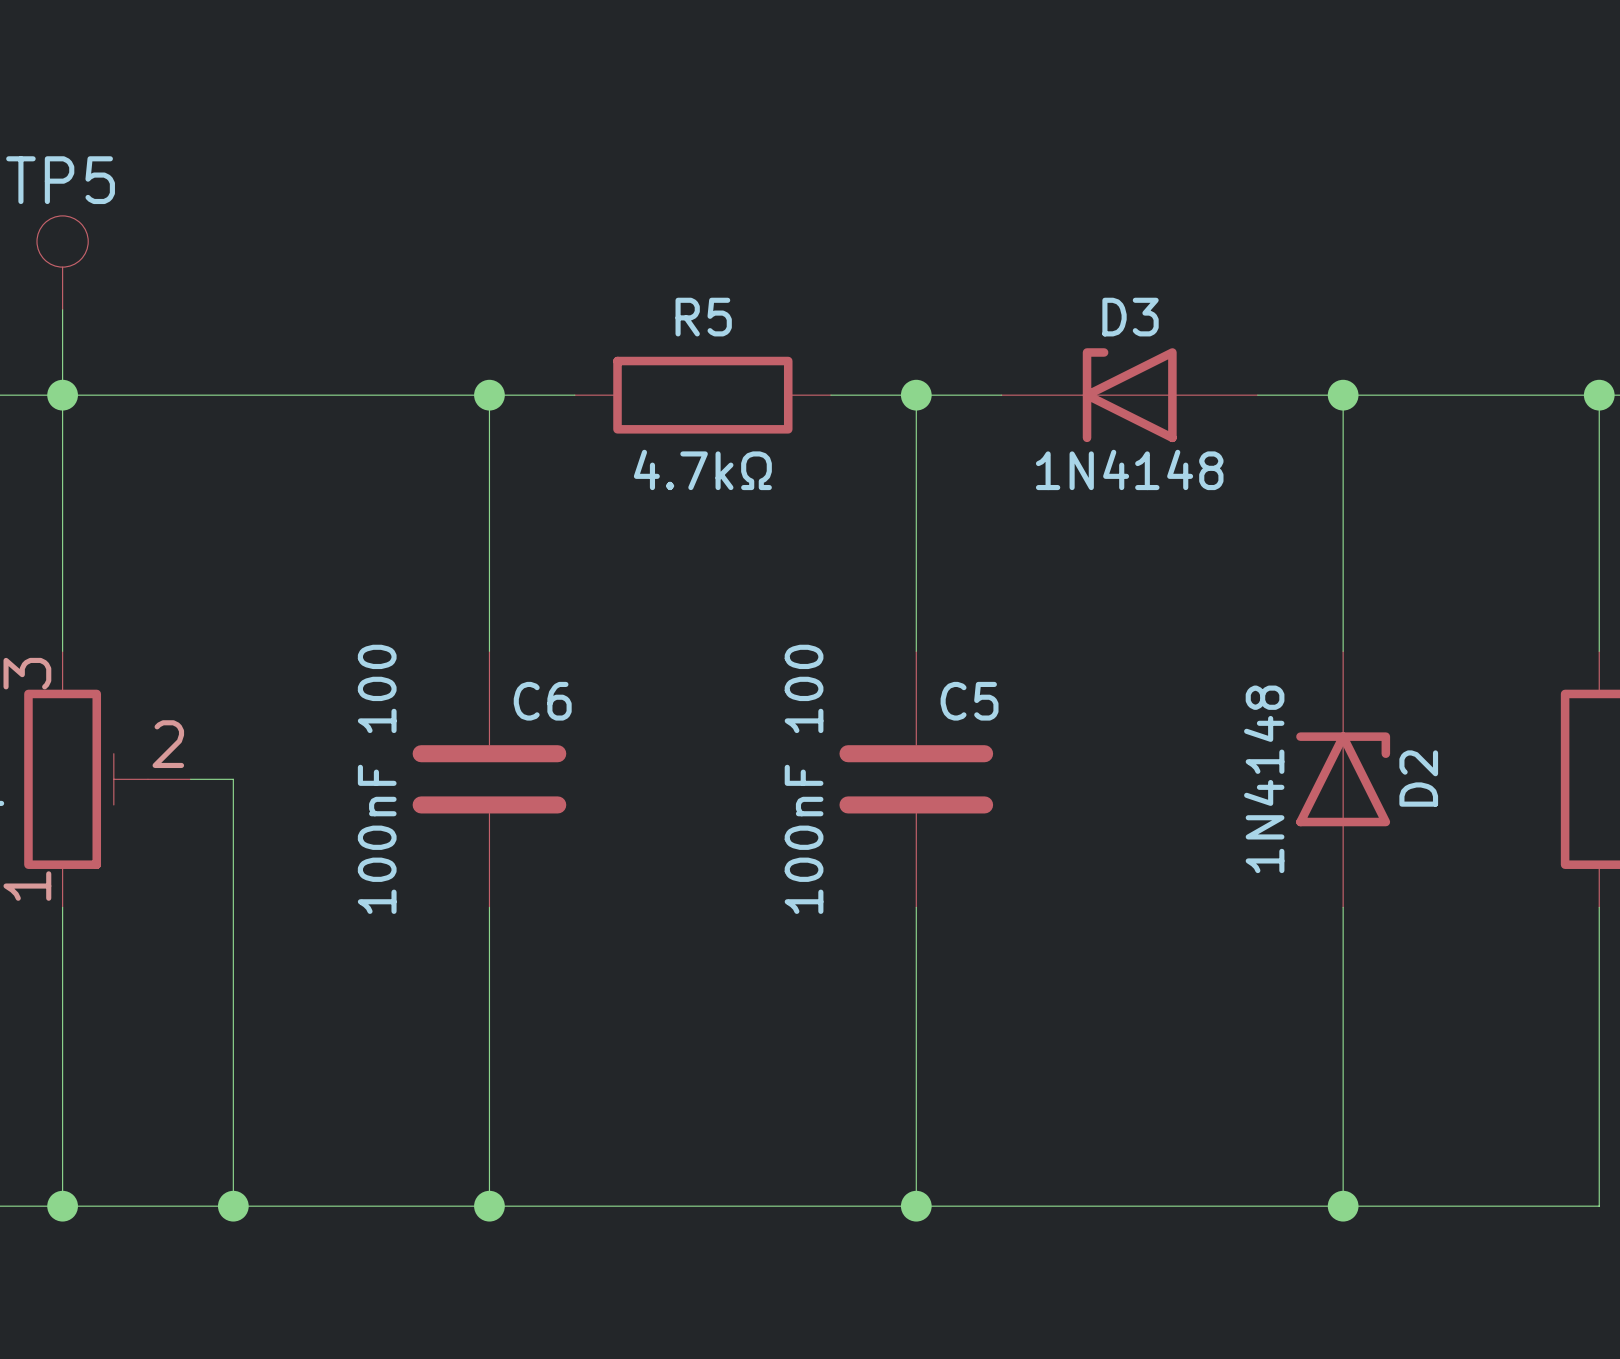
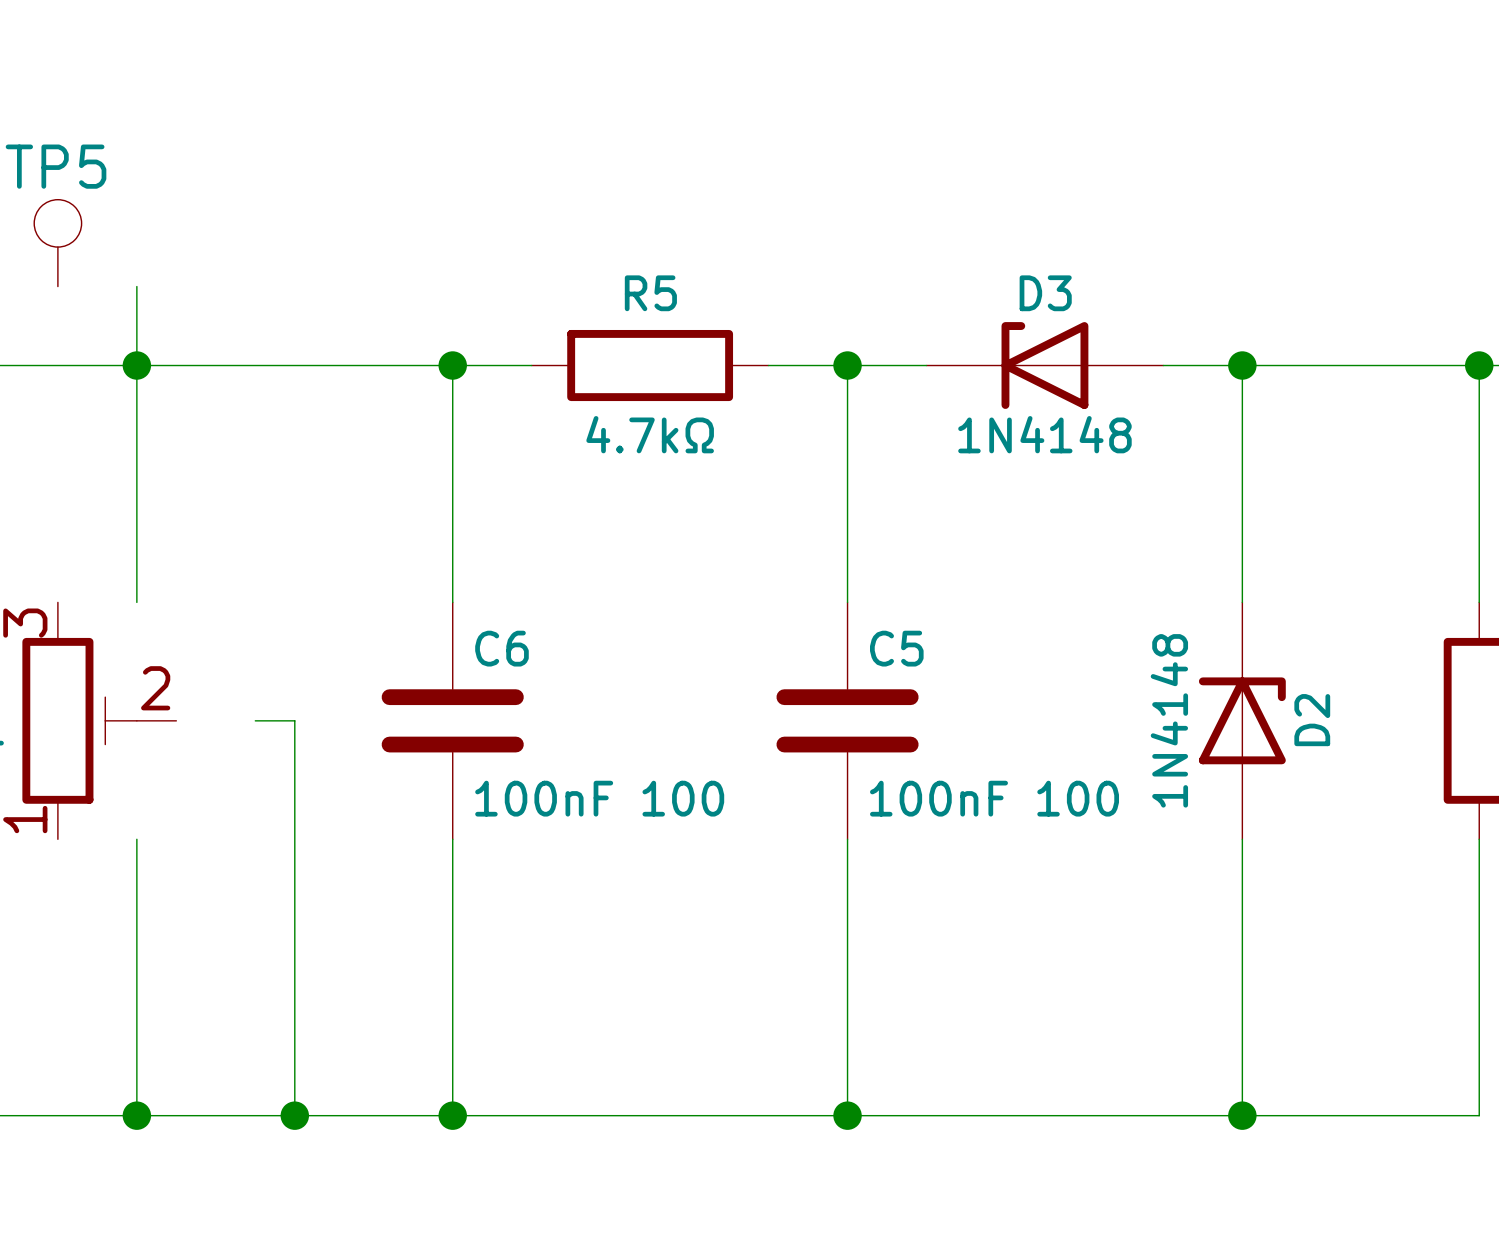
wire: (62, 309) (62, 651) -> (136, 286) (136, 602)
junction position: (62, 395) -> (136, 365)
wire: (190, 779) (233, 779) (233, 1206) -> (255, 720) (294, 720) (294, 1115)
C6 value rotation: 0° (377, 779) -> 90° clockwise (599, 798)
C5 value rotation: 0° (804, 779) -> 90° clockwise (994, 798)
wire: (62, 907) (62, 1206) -> (136, 839) (136, 1115)
junction: (62, 1206) -> none
junction: none -> (136, 1115)
junction: (233, 1206) -> none
junction: none -> (294, 1115)

